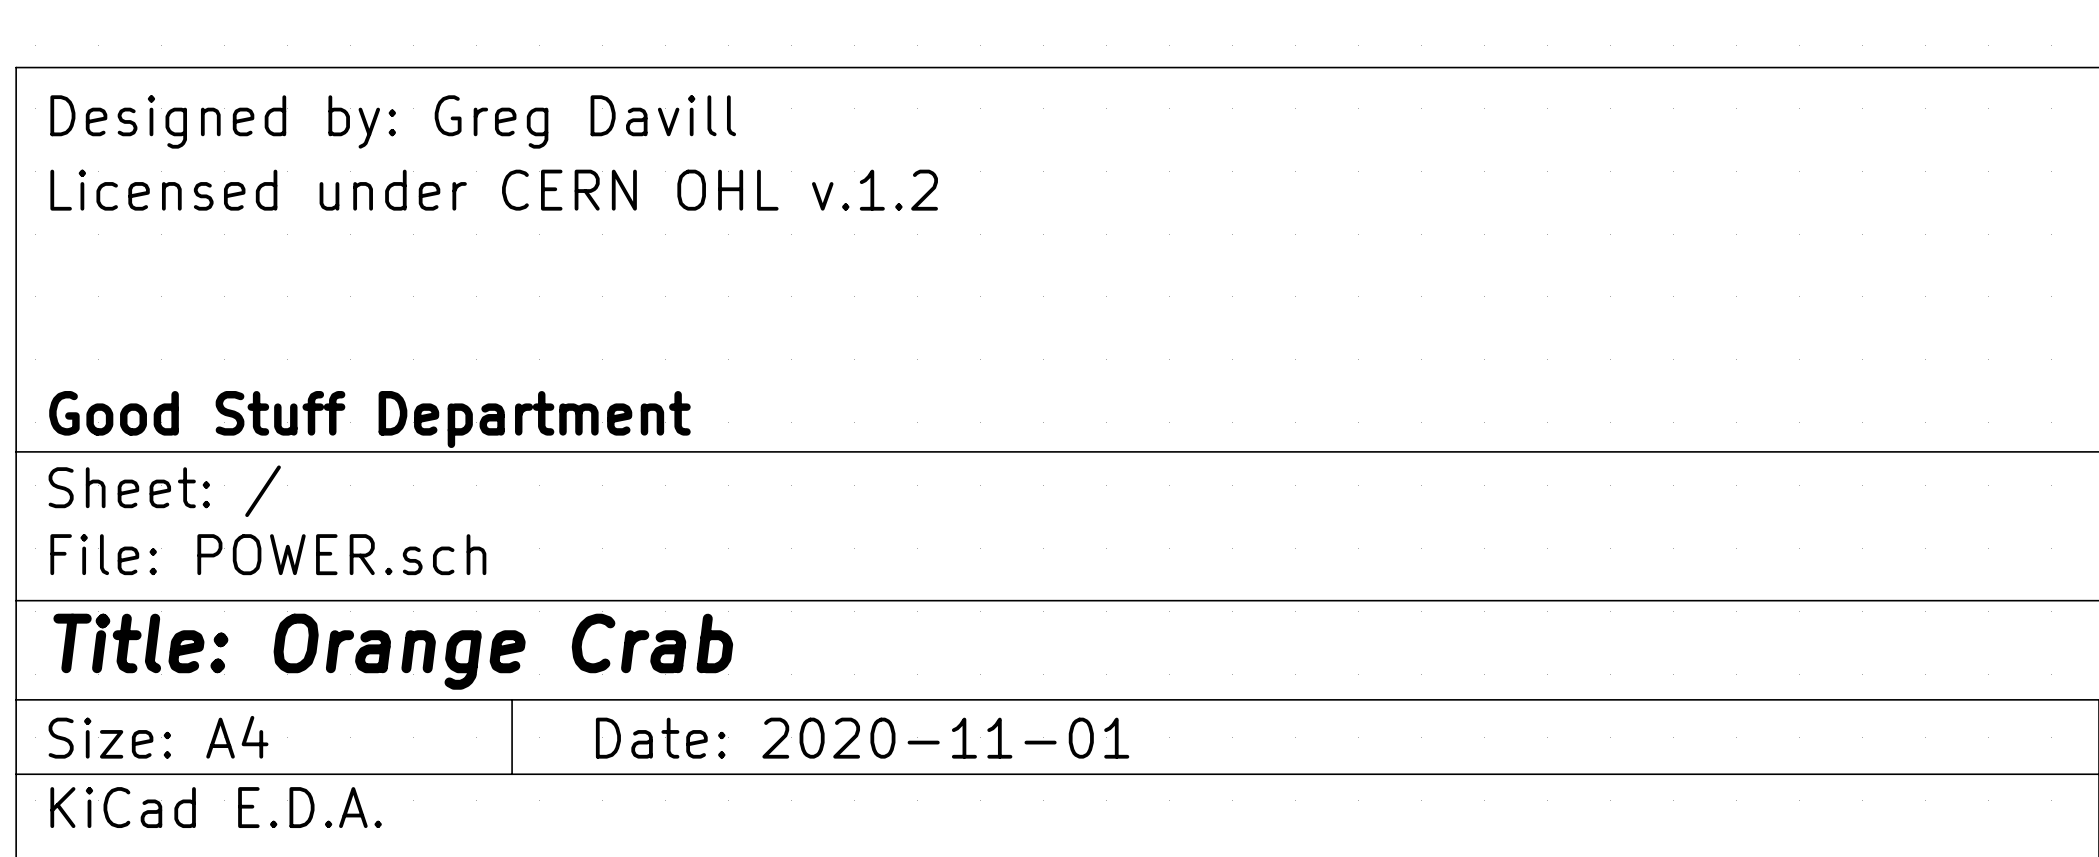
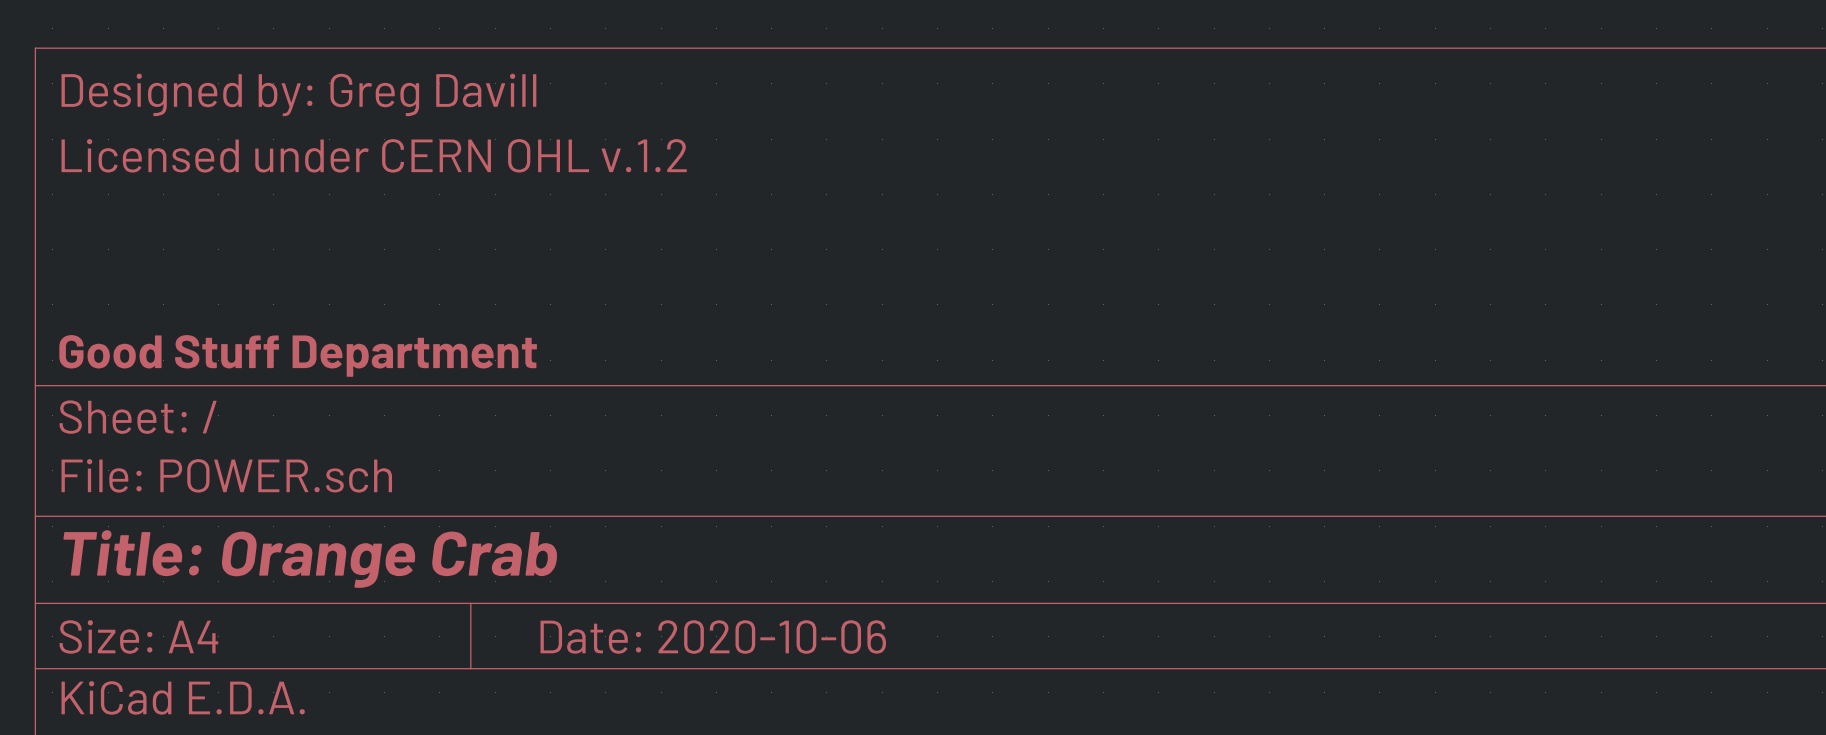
title block: Date: 2020-11-01 (862, 738) -> Date: 2020-10-06 (713, 637)

